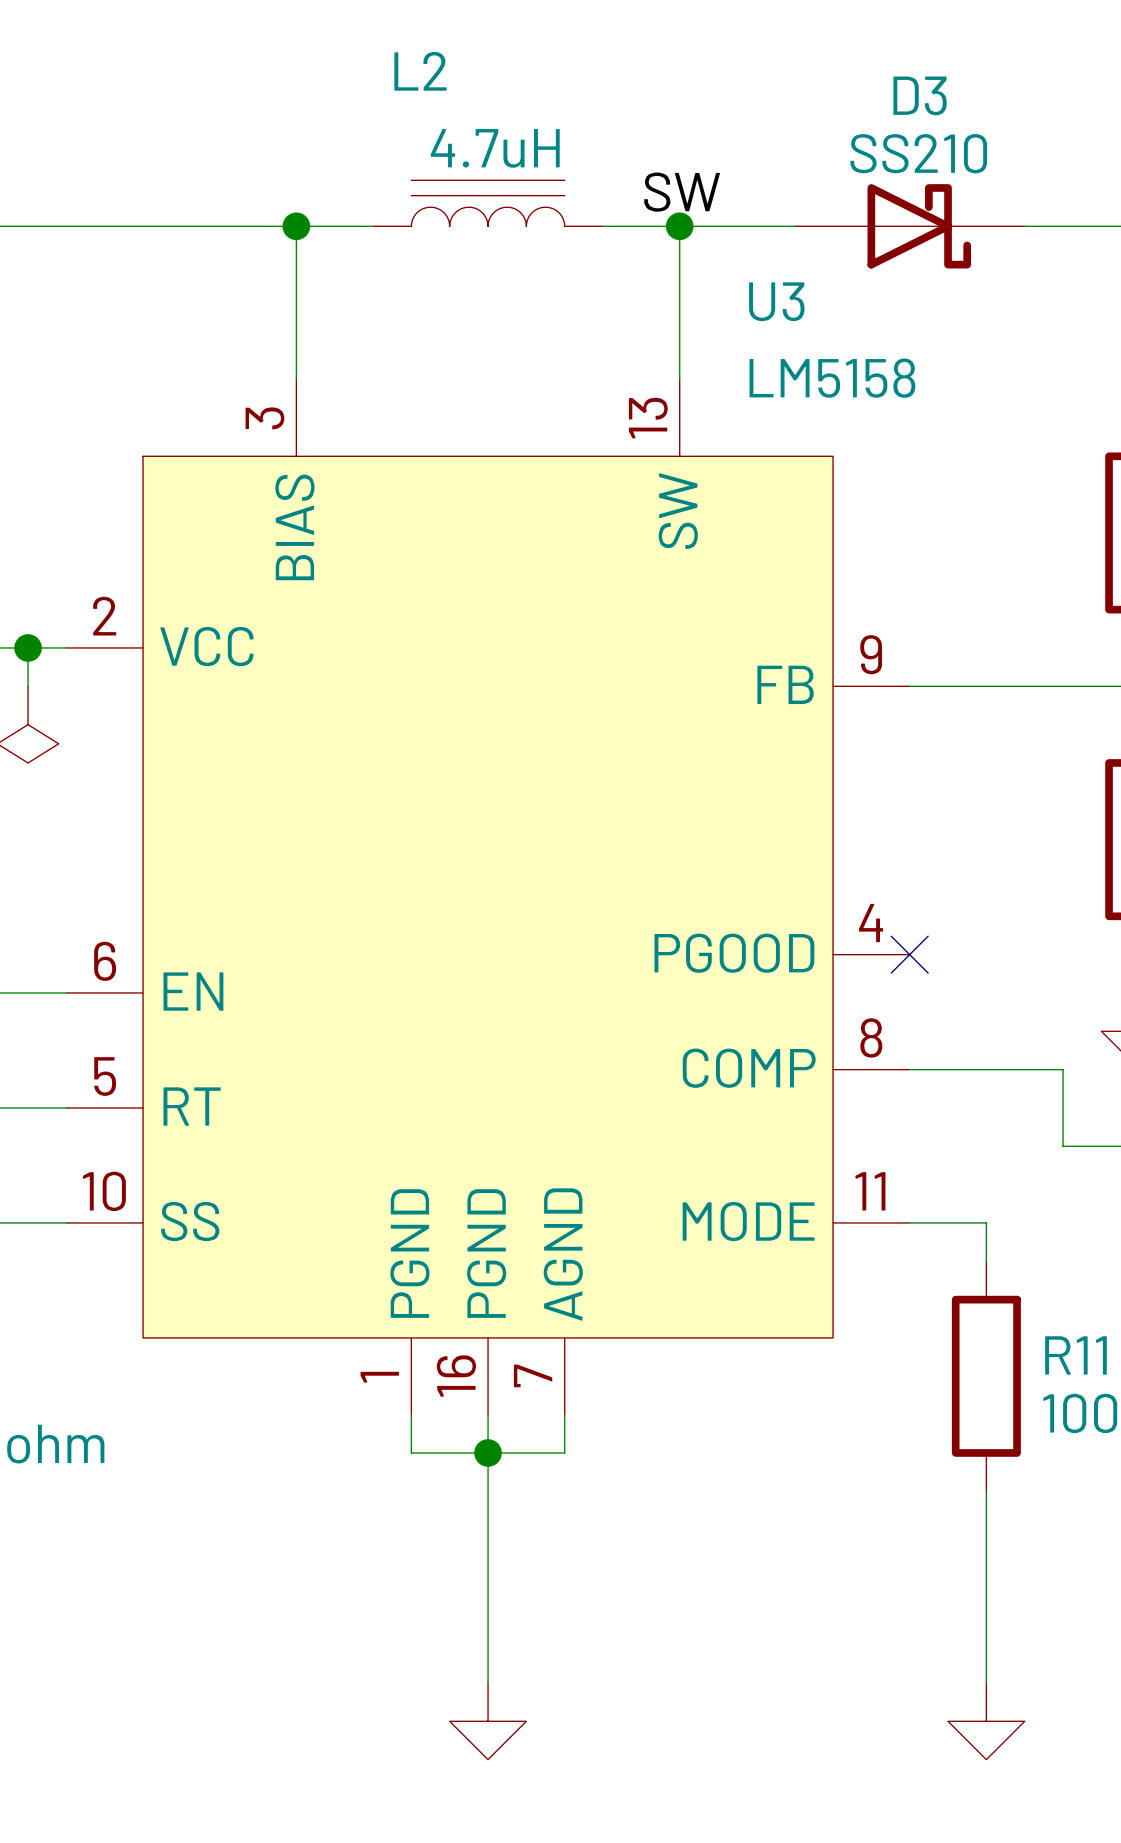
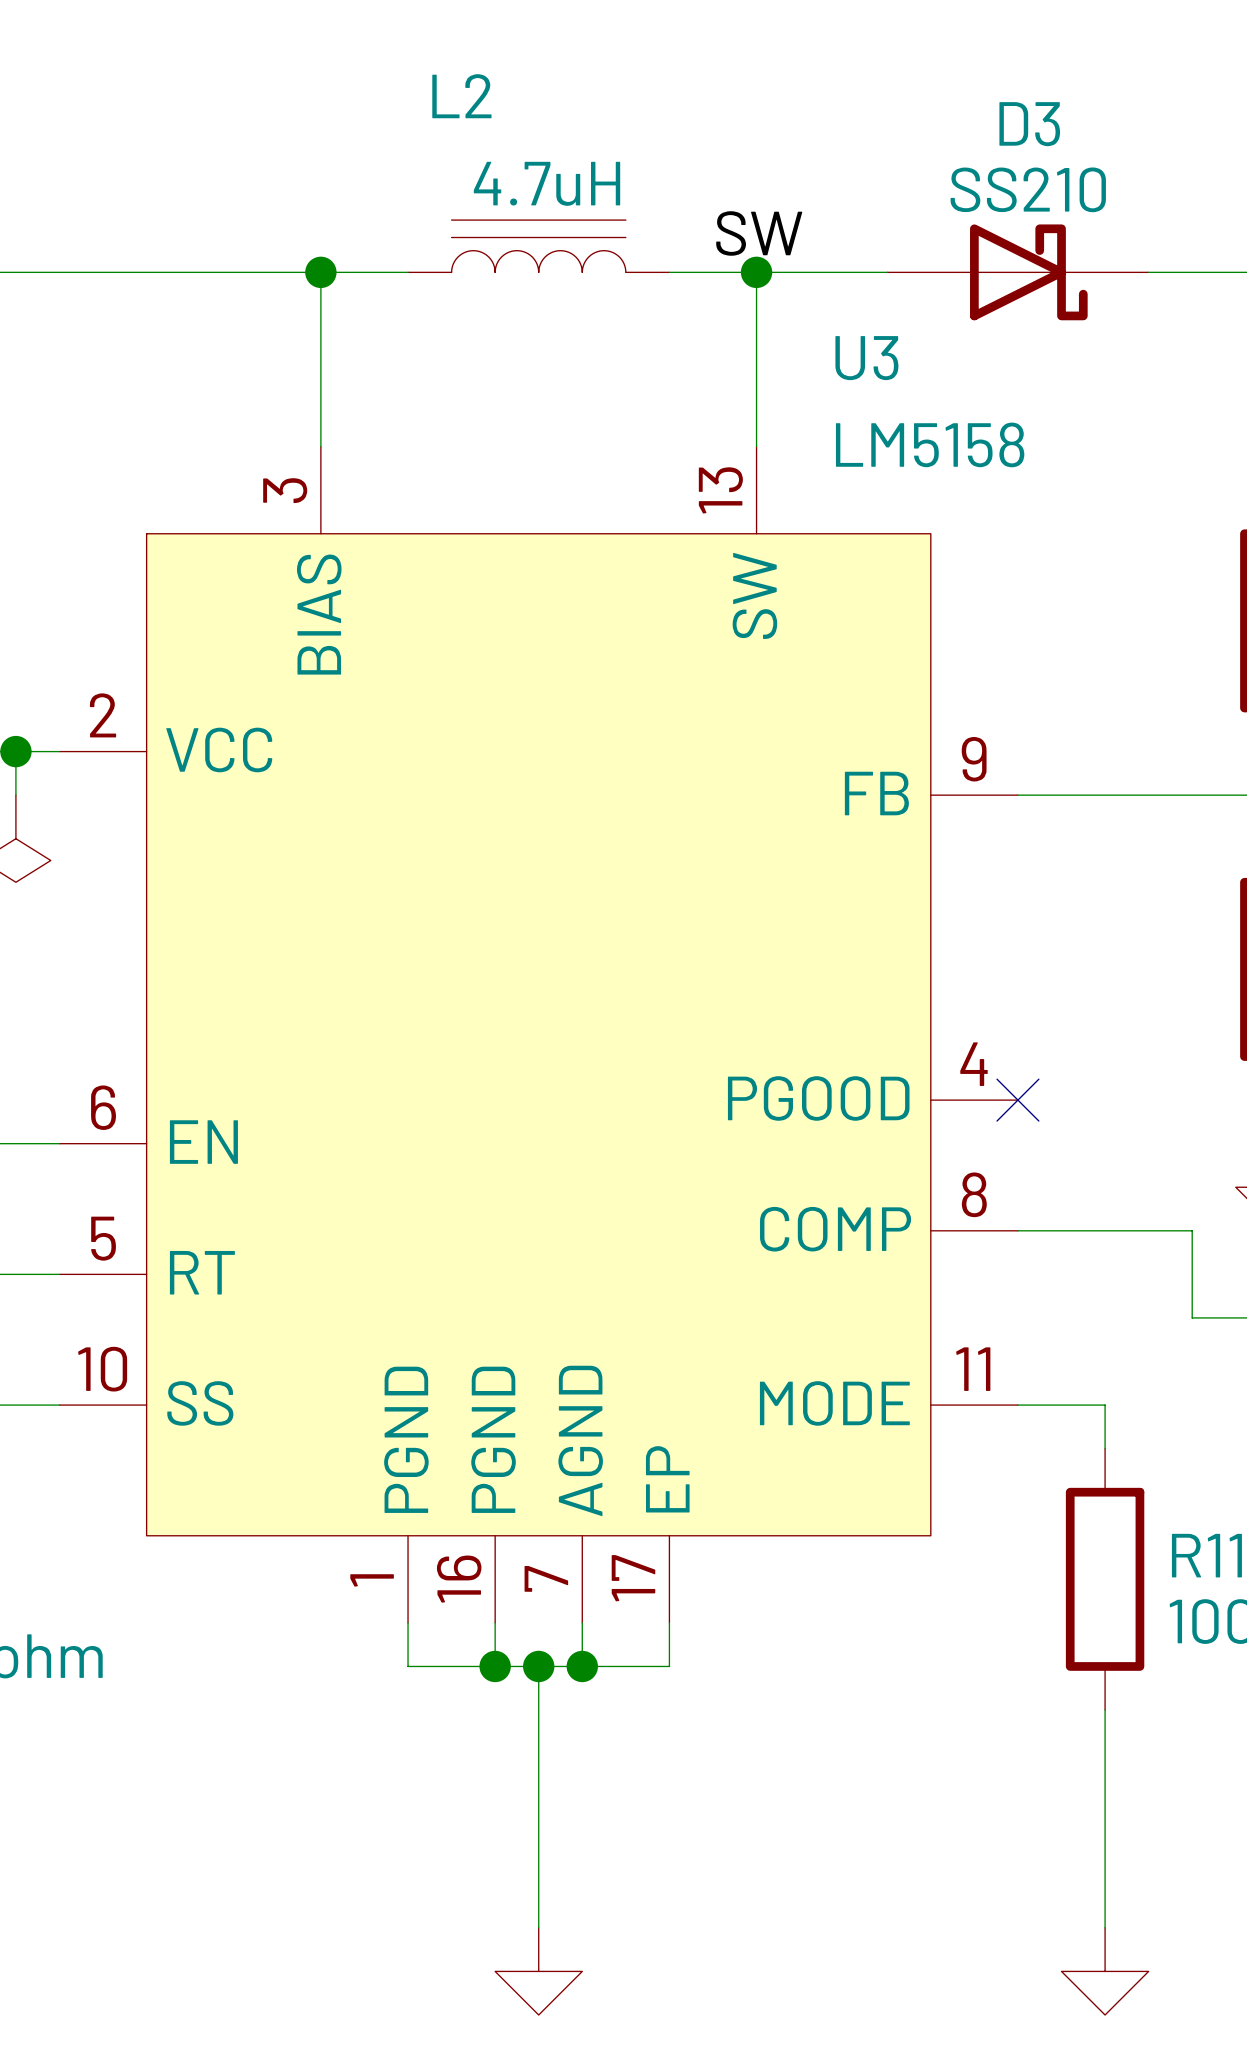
U3 symbol: [66, 379, 910, 1415] -> [59, 446, 1018, 1623]
wire: (411, 1414) (411, 1452) -> (408, 1622) (408, 1666) (451, 1666)
wire: none -> (495, 1622) (495, 1666)
wire: (488, 1414) (488, 1452) -> (582, 1622) (582, 1666)
wire: (564, 1414) (564, 1452) -> (669, 1622) (669, 1666) (625, 1666)
junction: none -> (495, 1666)
junction: none -> (582, 1666)

